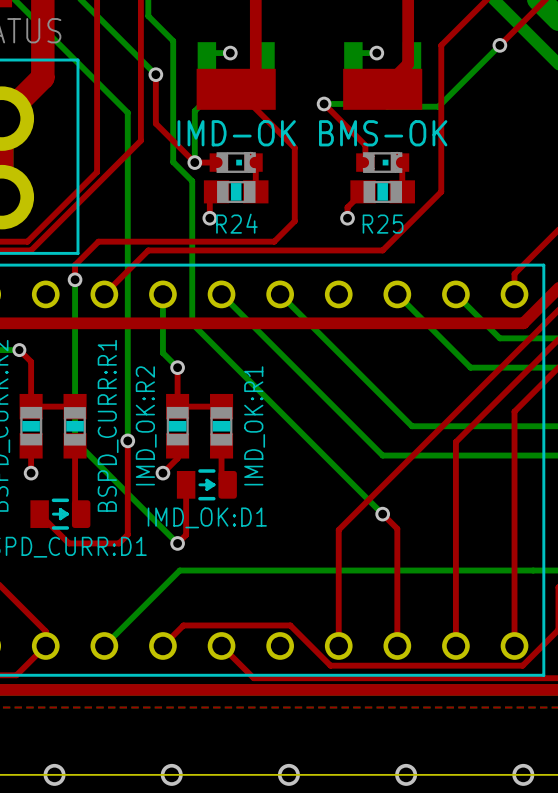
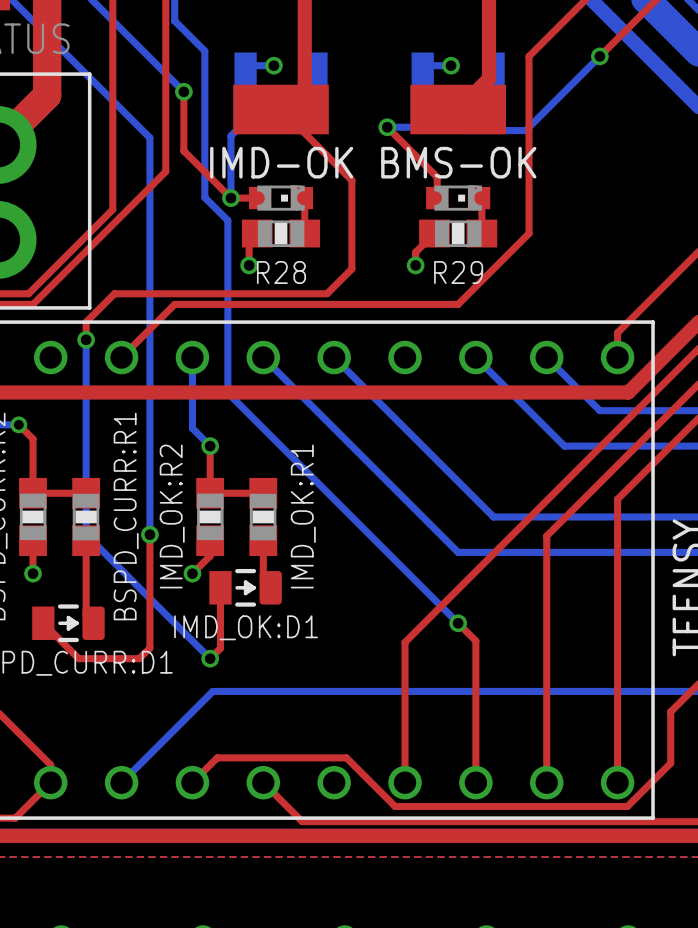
R24 name: R24 (236, 223) -> R28 (281, 272)
R25 name: R25 (383, 224) -> R29 (458, 272)

